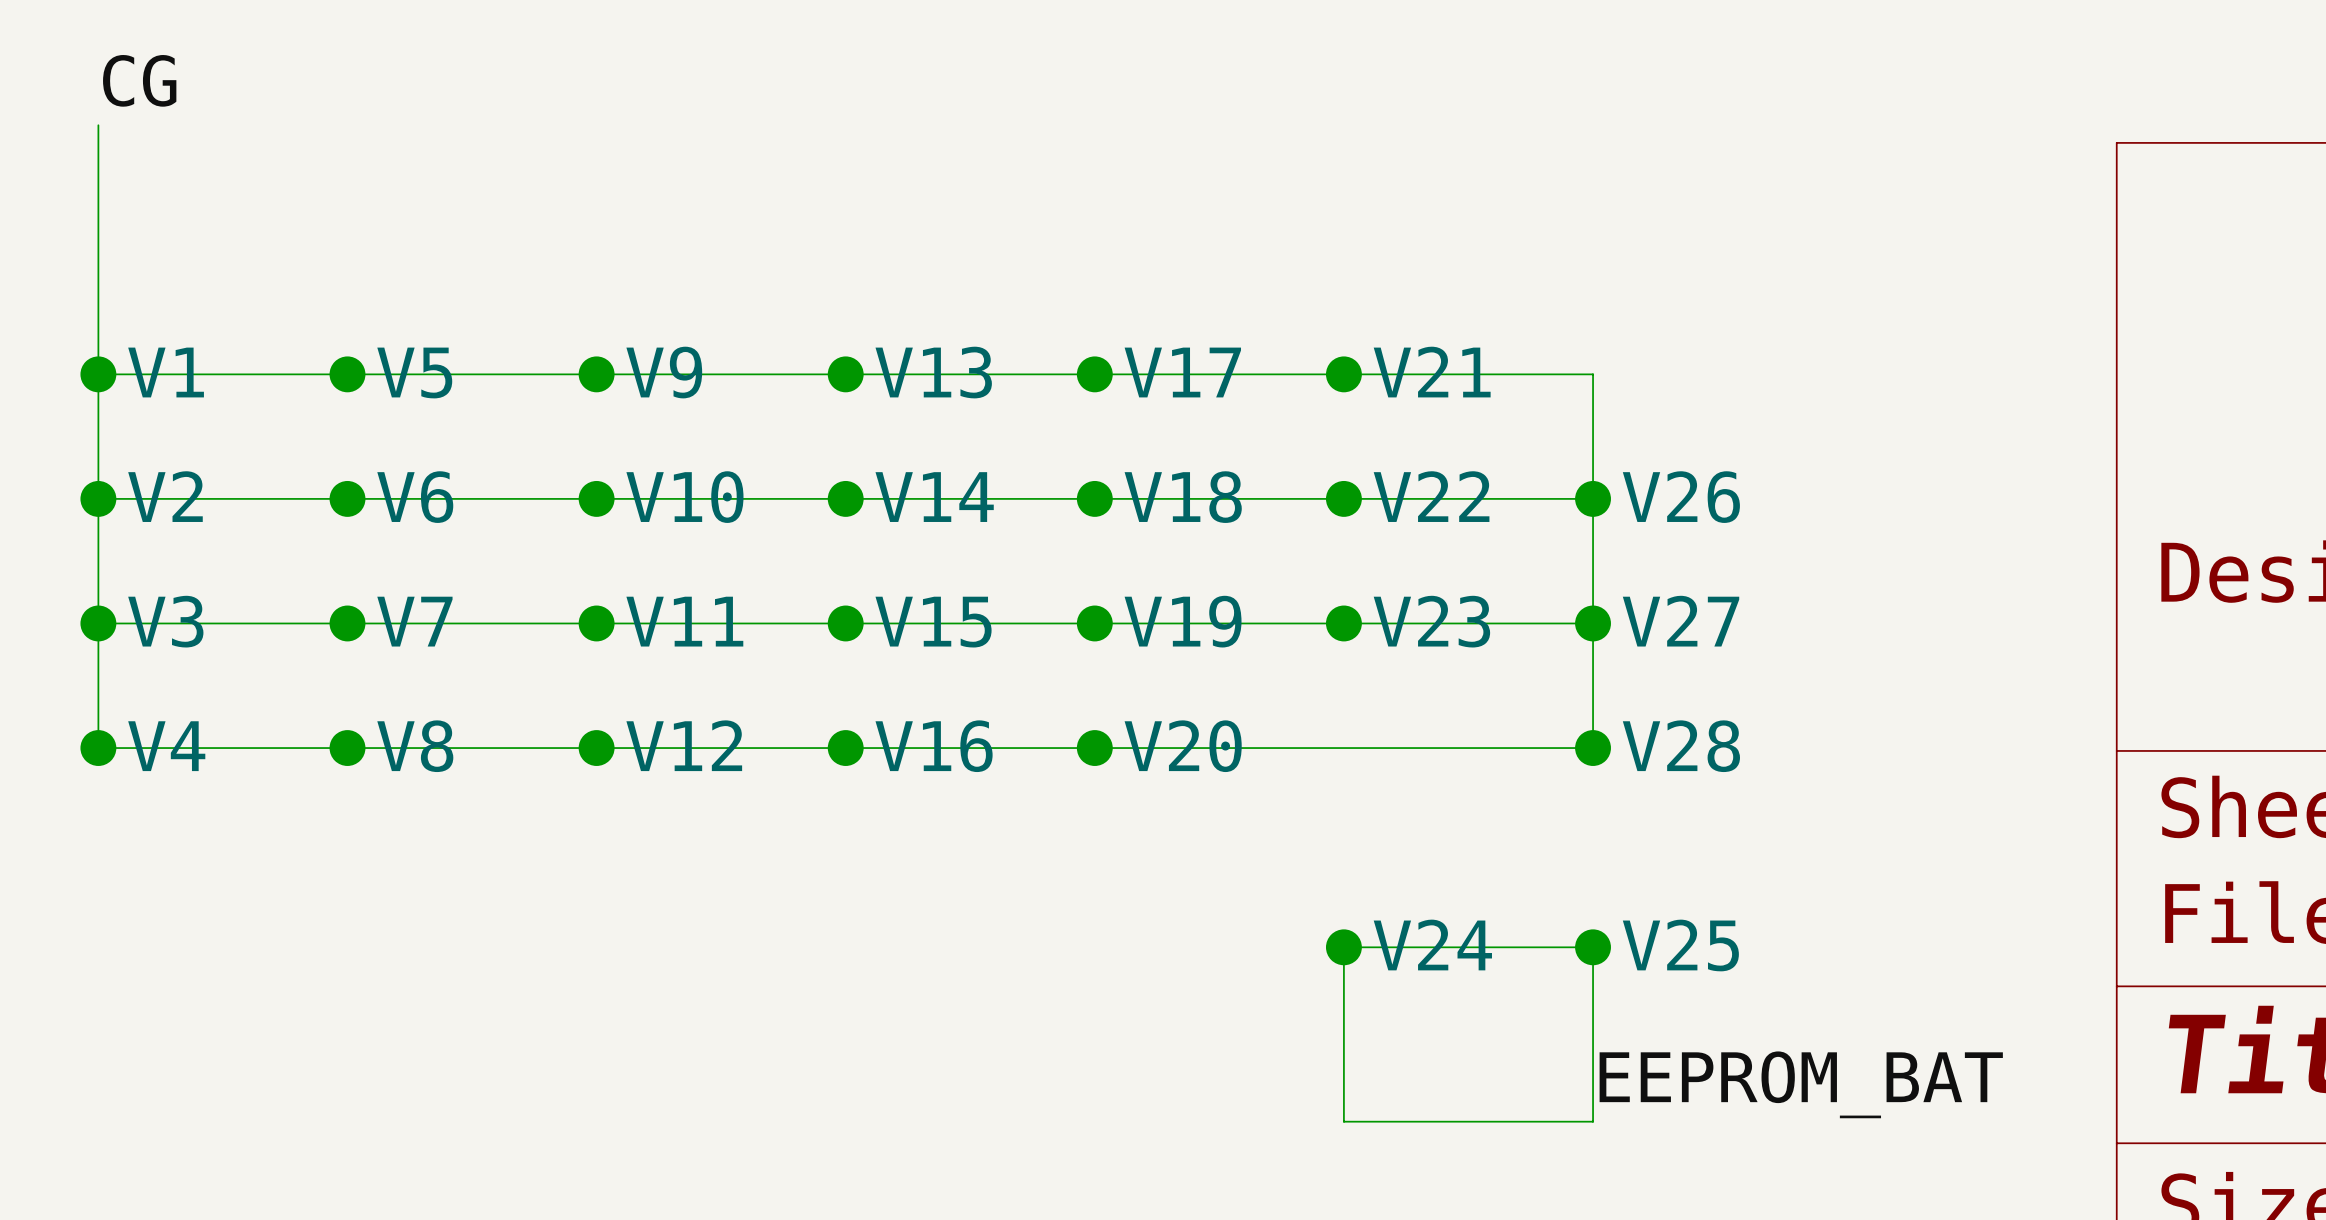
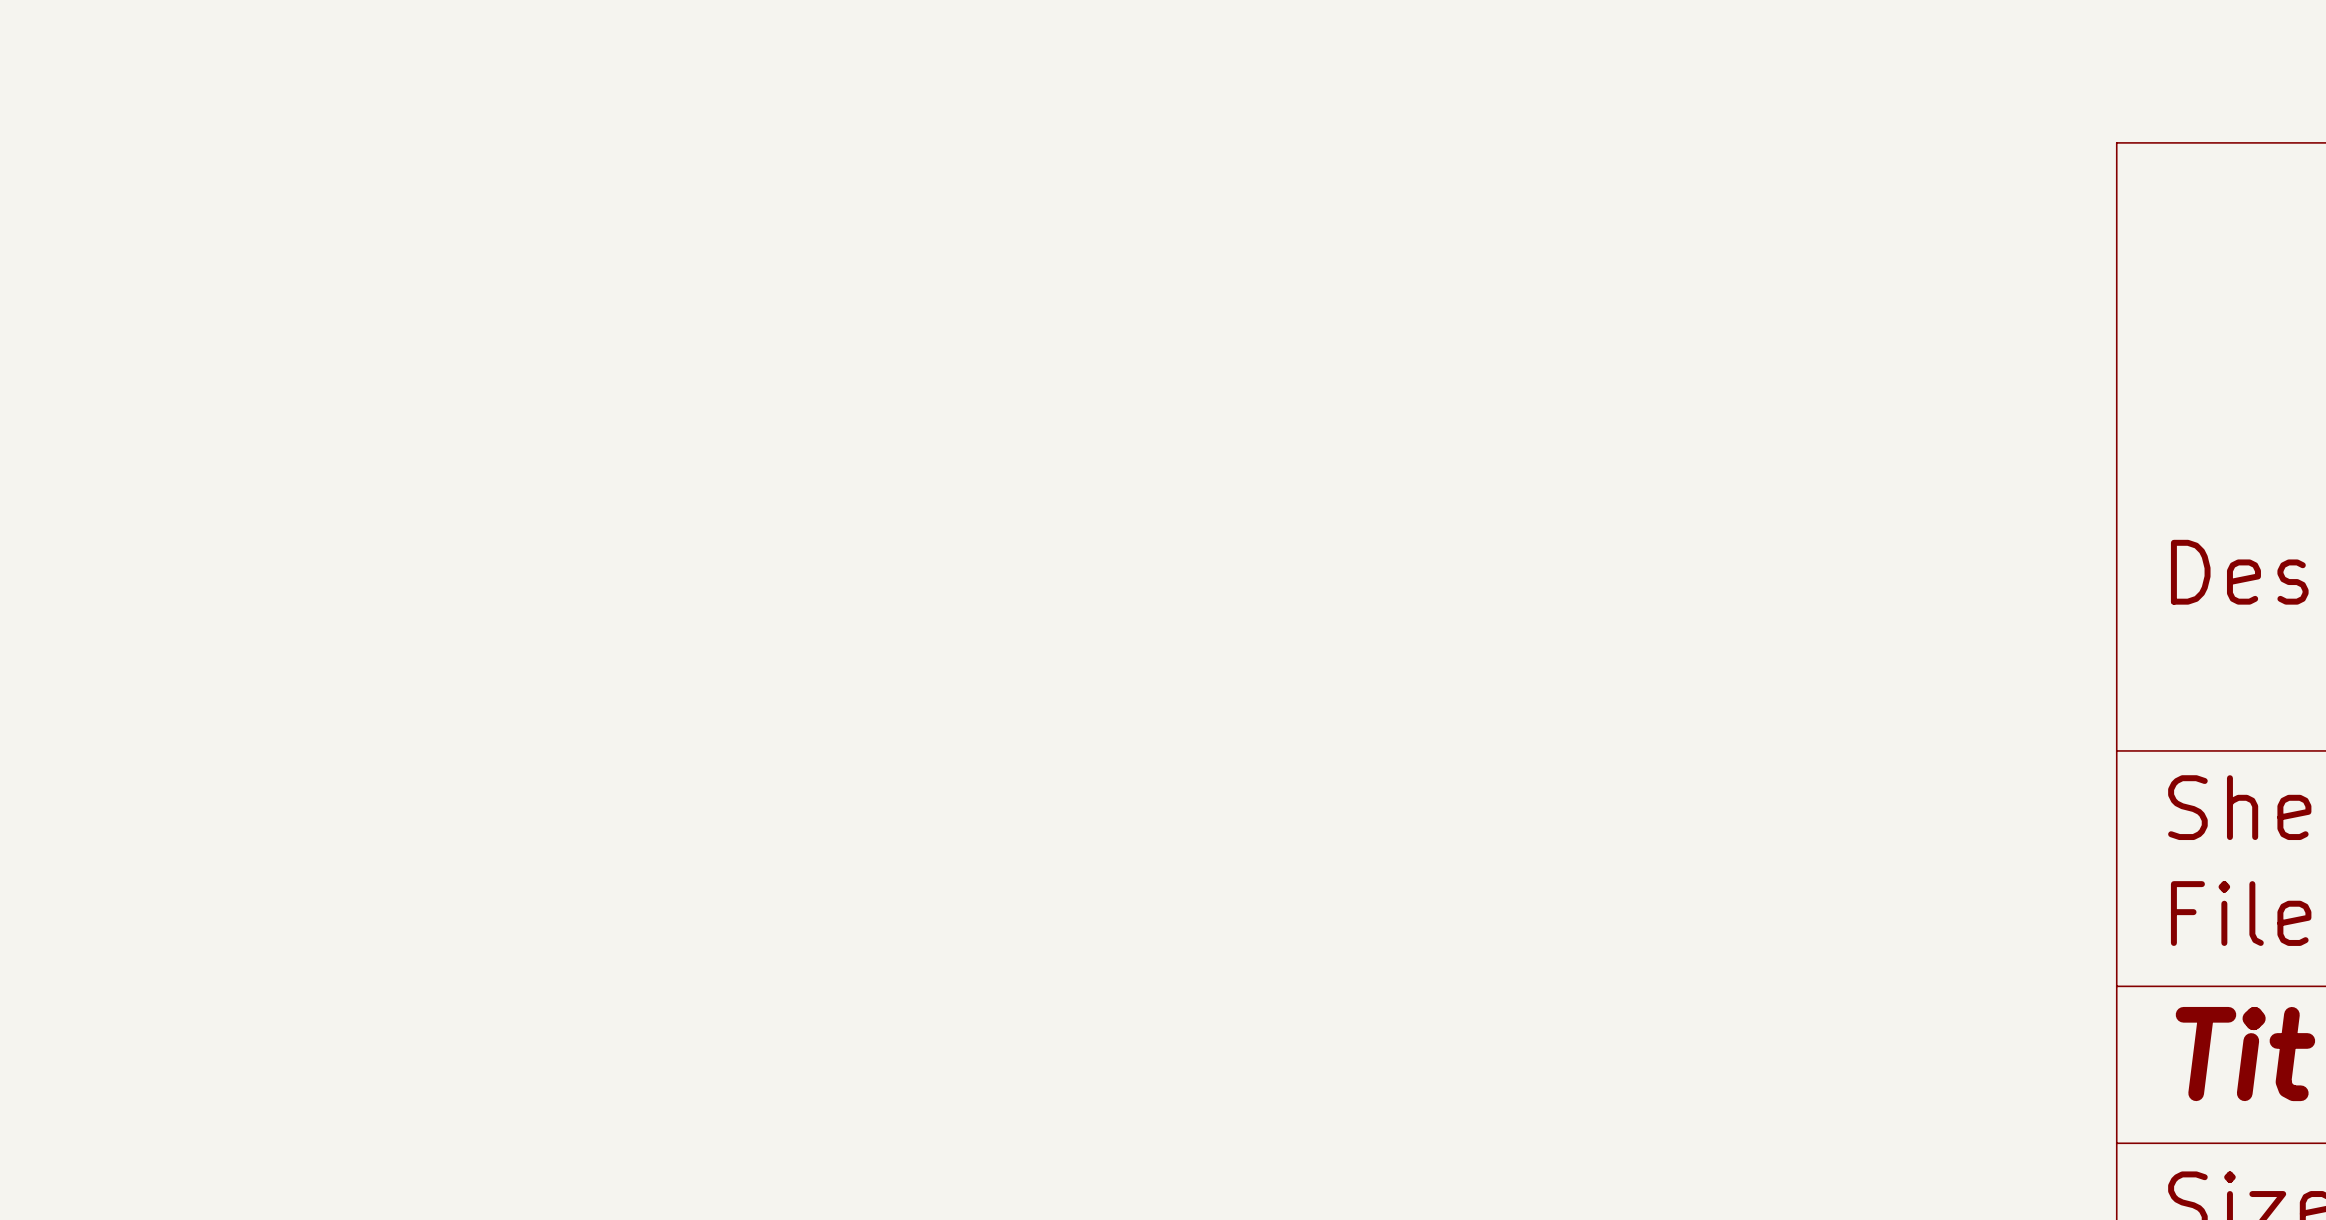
label: CG (139, 80) -> none
wire: (98, 125) (98, 748) (1593, 748) (1593, 374) (98, 374) -> none
V1: (166, 372) -> none
V5: (414, 372) -> none
V9: (664, 372) -> none
V13: (933, 372) -> none
V17: (1182, 372) -> none
V21: (1432, 372) -> none
junction: (98, 374) -> none
junction: (347, 374) -> none
junction: (596, 374) -> none
junction: (845, 374) -> none
junction: (1094, 374) -> none
junction: (1343, 374) -> none
V2: (165, 496) -> none
V22: (1431, 496) -> none
V6: (415, 497) -> none
V10: (684, 497) -> none
V14: (934, 497) -> none
V18: (1183, 497) -> none
V26: (1681, 497) -> none
wire: (98, 498) (1593, 498) -> none
junction: (98, 498) -> none
junction: (347, 498) -> none
junction: (596, 498) -> none
junction: (845, 498) -> none
junction: (1094, 498) -> none
junction: (1343, 498) -> none
junction: (1593, 498) -> none
V3: (165, 621) -> none
V7: (414, 621) -> none
V11: (684, 621) -> none
V19: (1183, 621) -> none
V23: (1431, 621) -> none
V27: (1681, 621) -> none
V15: (933, 622) -> none
wire: (98, 623) (1593, 623) -> none
junction: (98, 623) -> none
junction: (347, 623) -> none
junction: (596, 623) -> none
junction: (845, 623) -> none
junction: (1094, 623) -> none
junction: (1343, 623) -> none
junction: (1593, 623) -> none
V12: (684, 745) -> none
V4: (166, 746) -> none
V8: (415, 746) -> none
V16: (934, 746) -> none
V20: (1183, 746) -> none
V28: (1681, 746) -> none
junction: (98, 748) -> none
junction: (347, 748) -> none
junction: (596, 748) -> none
junction: (845, 748) -> none
junction: (1094, 748) -> none
junction: (1593, 748) -> none
V24: (1432, 945) -> none
V25: (1680, 945) -> none
wire: (1343, 947) (1343, 1121) (1593, 1121) (1593, 947) (1343, 947) -> none
junction: (1343, 947) -> none
junction: (1593, 947) -> none
label: EEPROM_BAT (1801, 1084) -> none

